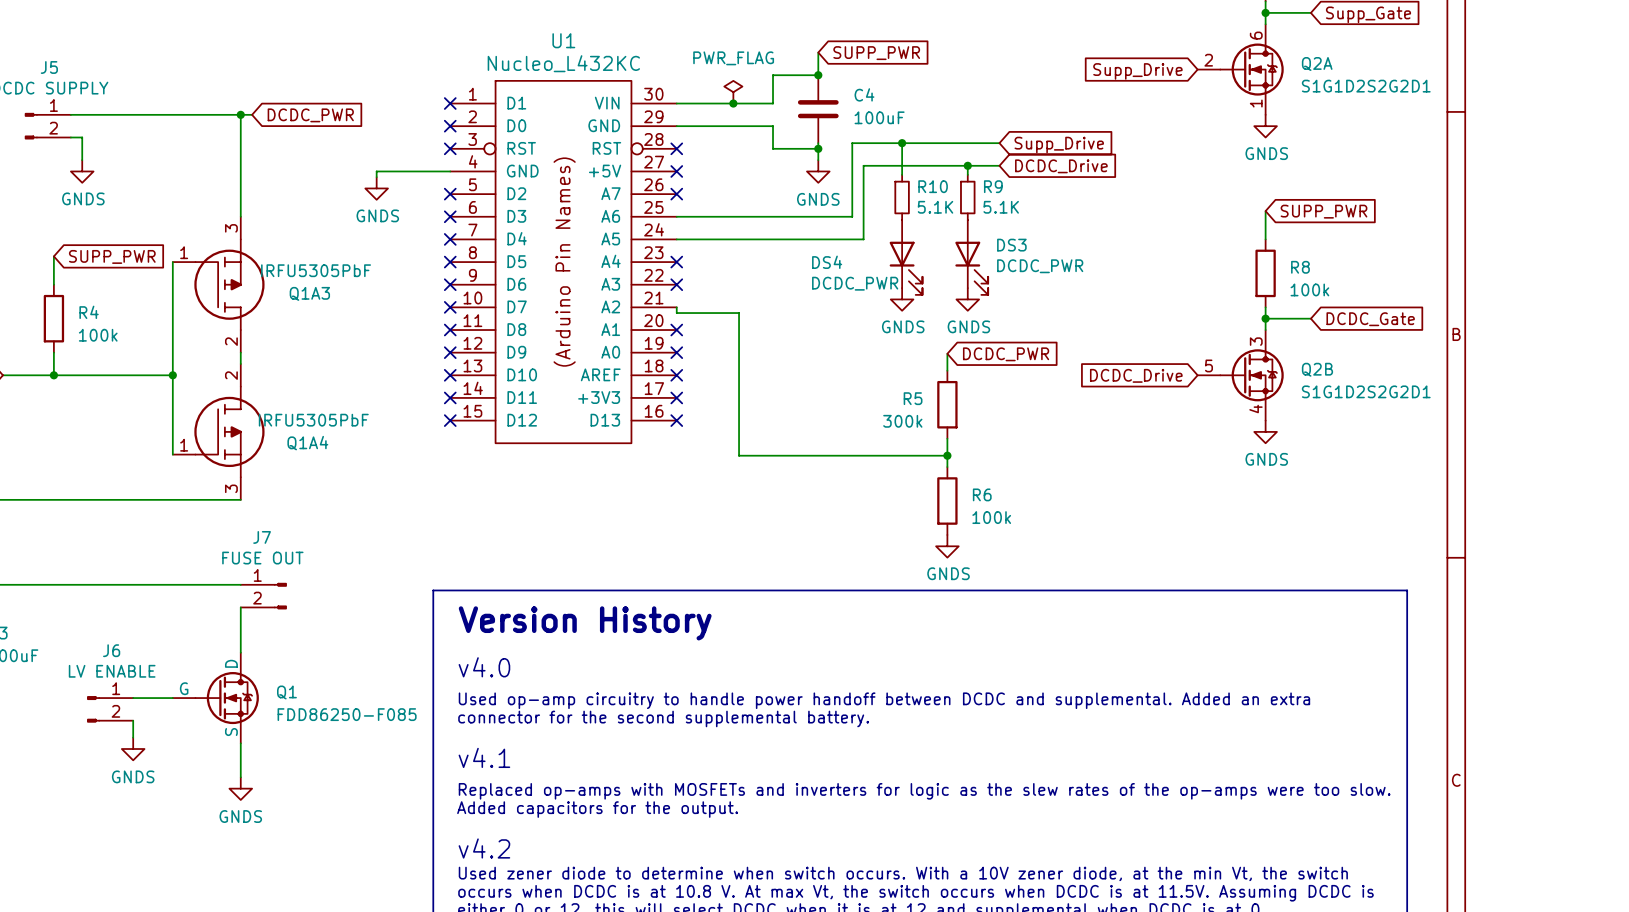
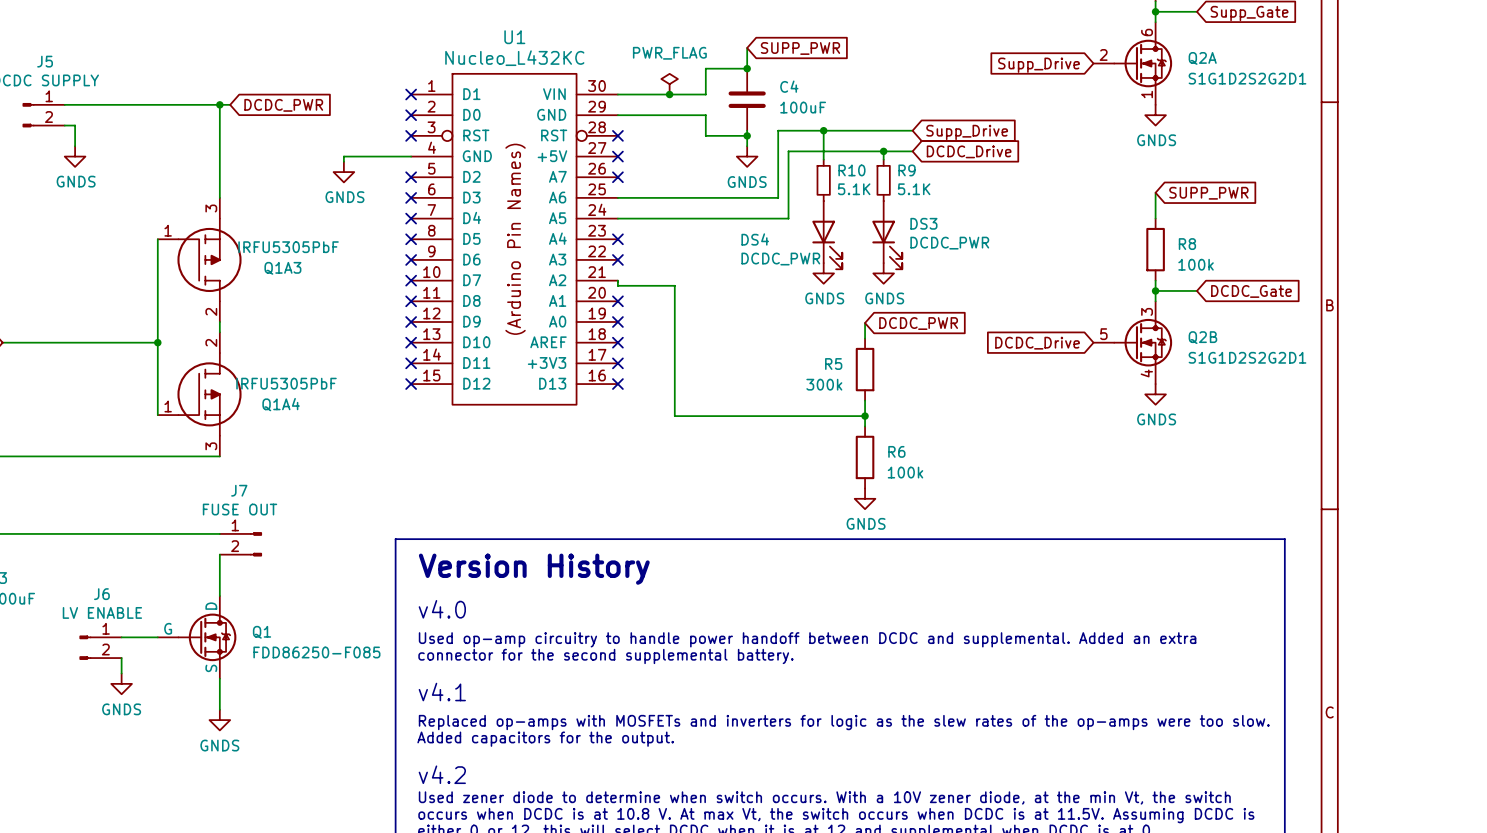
wire: (53, 256) (53, 284) -> none
global label: SUPP_PWR (112, 256) -> none
R4: 100k (53, 318) -> none
wire: (53, 352) (53, 375) -> none
junction: (53, 375) -> none

